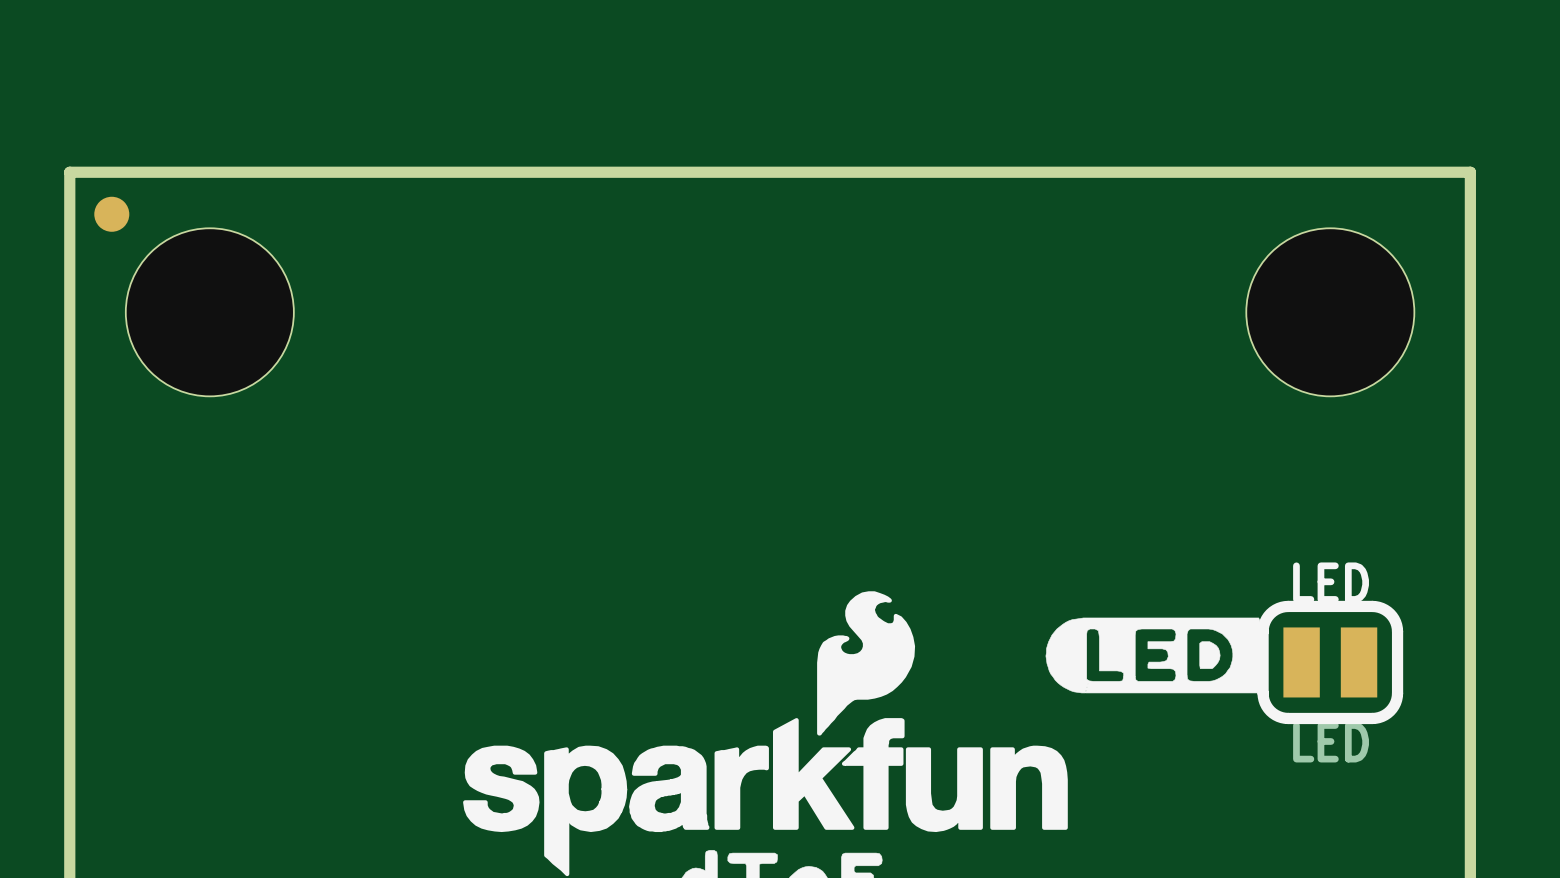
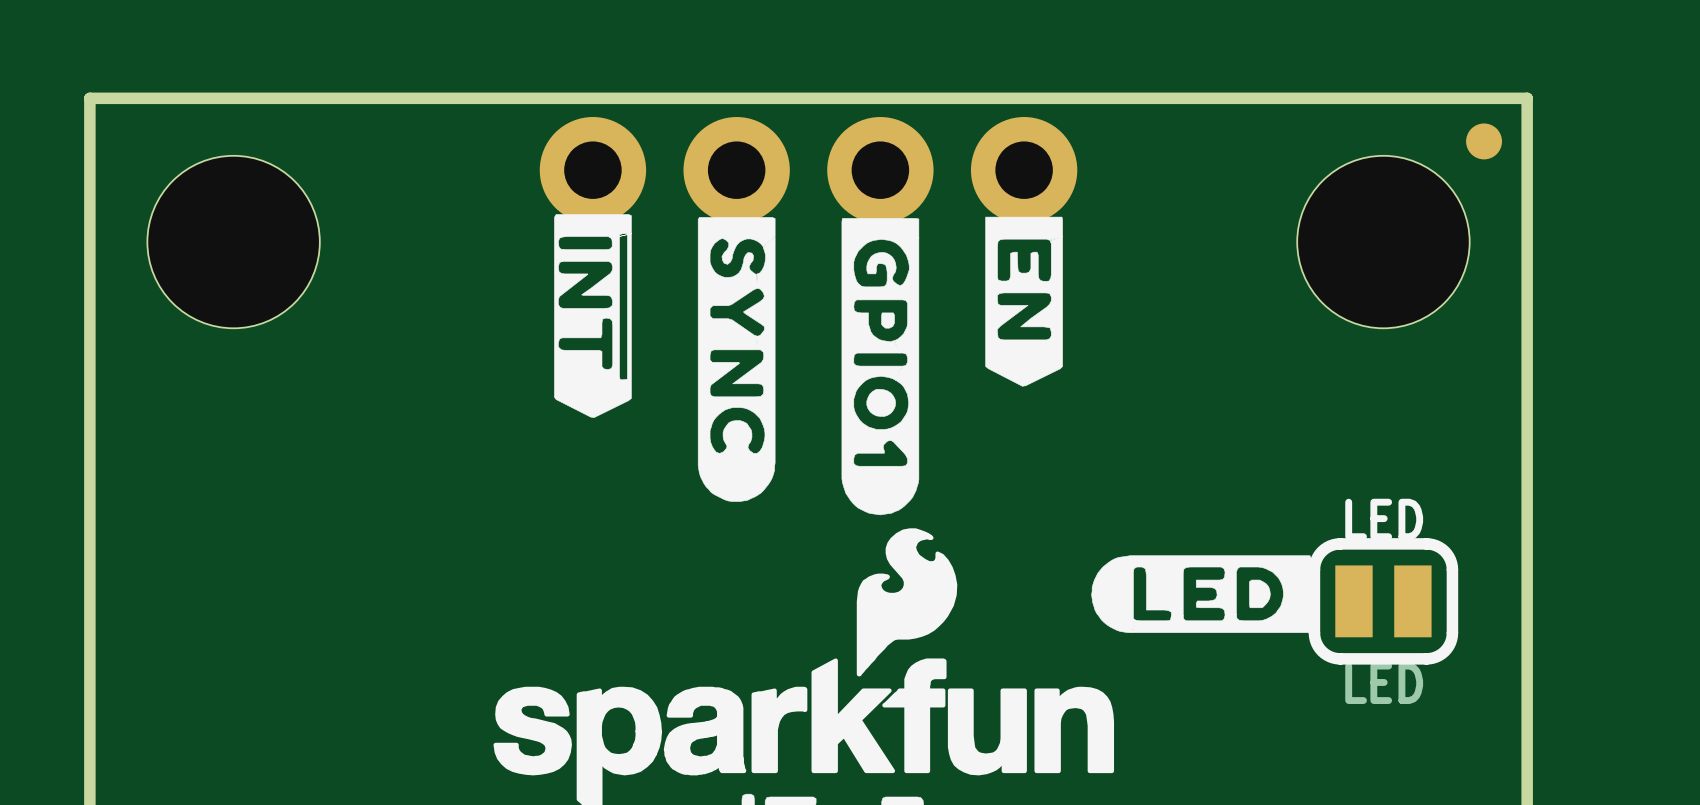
part position: (111, 214) -> (1484, 141)
part: none -> (808, 170)
drawing: none -> [554, 214, 1063, 516]

